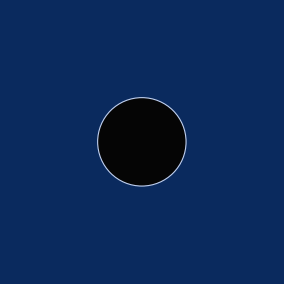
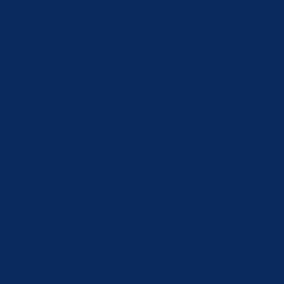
hole: (141, 141) -> none

